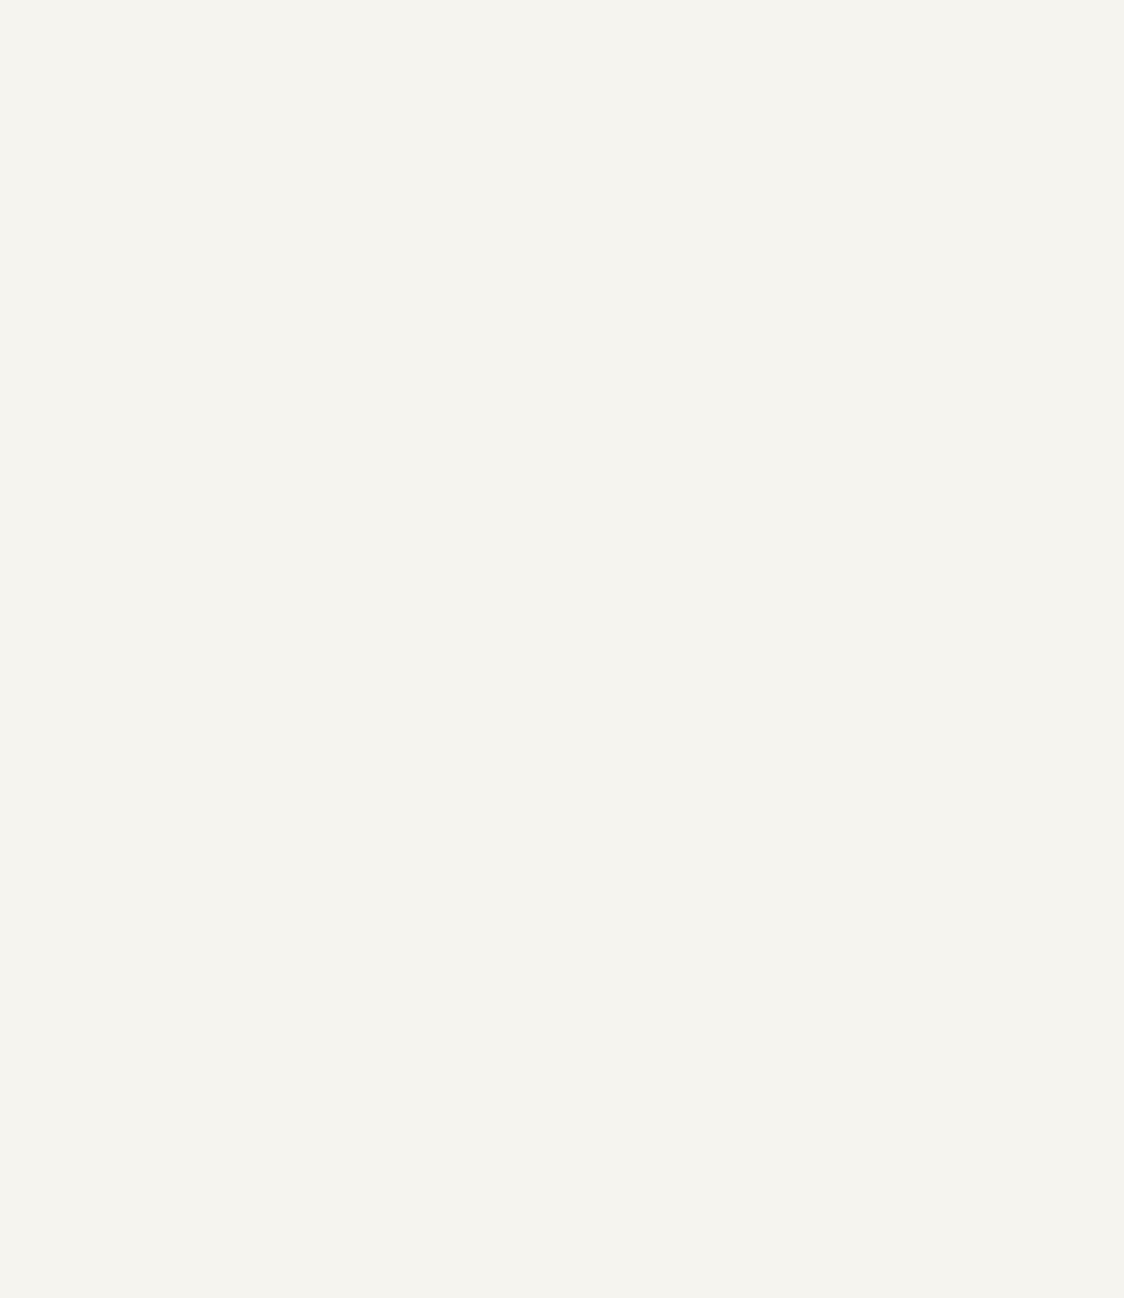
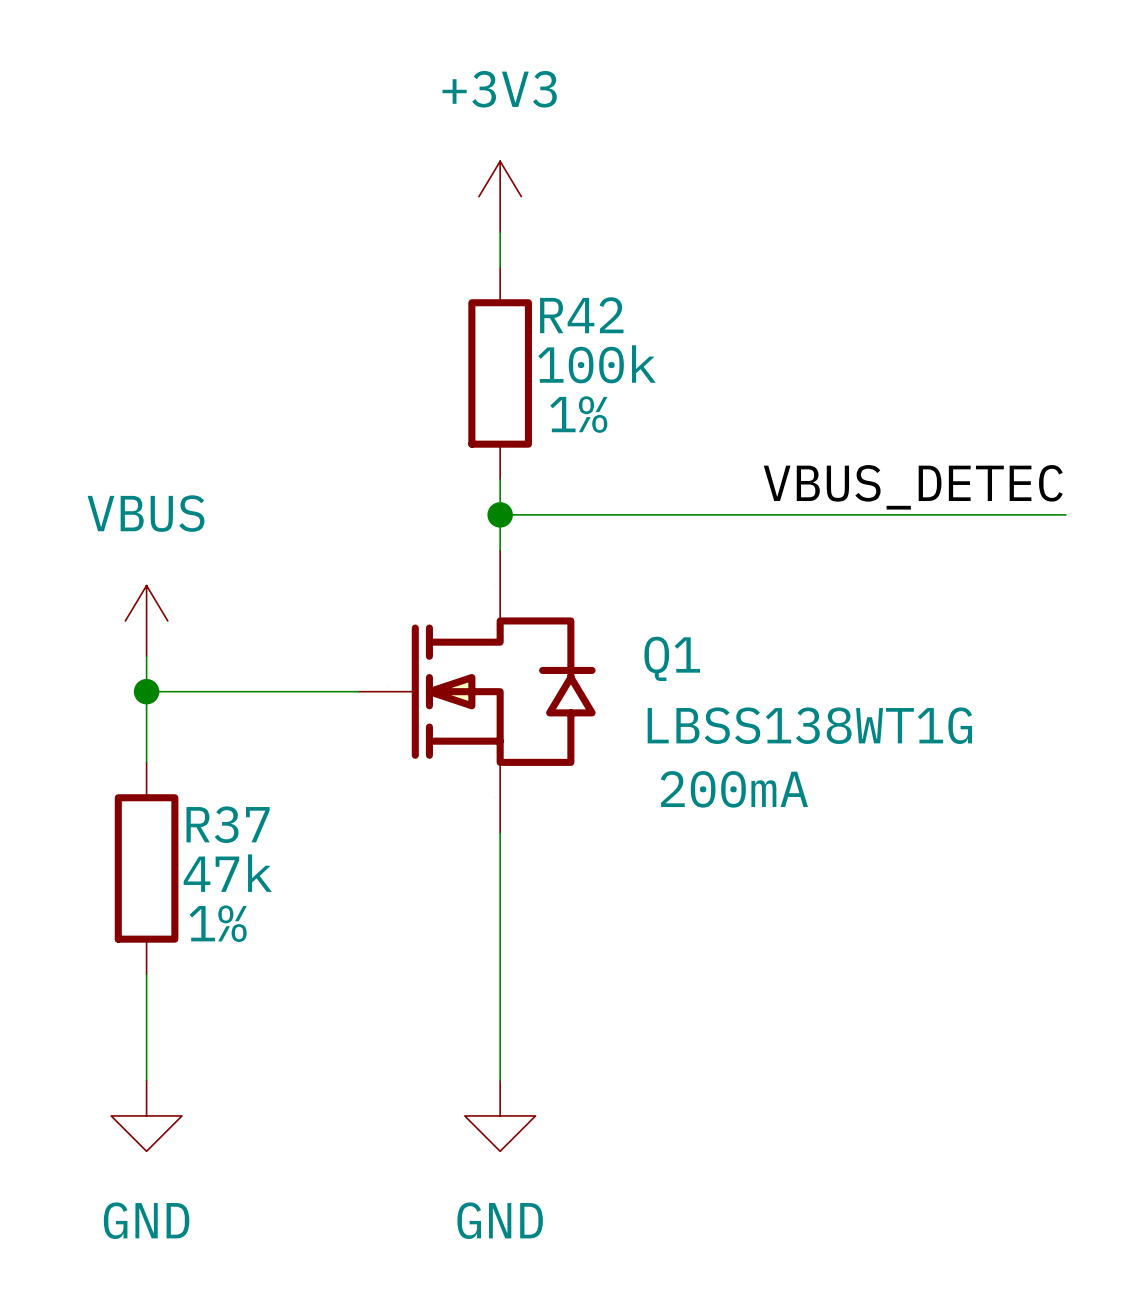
power symbol: none -> +3V3 (500, 196)
wire: none -> (500, 232) (500, 267)
R42: none -> 100k (500, 373)
wire: none -> (500, 479) (500, 550)
label: none -> VBUS_DETEC (913, 487)
wire: none -> (500, 514) (1065, 514)
junction: none -> (500, 514)
power symbol: none -> VBUS (146, 620)
wire: none -> (146, 656) (146, 762)
wire: none -> (146, 691) (358, 691)
junction: none -> (146, 691)
Q1: none -> LBSS138WT1G (477, 691)
wire: none -> (500, 833) (500, 1080)
R37: none -> 47k (146, 868)
wire: none -> (146, 974) (146, 1080)
power symbol: none -> GND (146, 1115)
power symbol: none -> GND (500, 1115)

